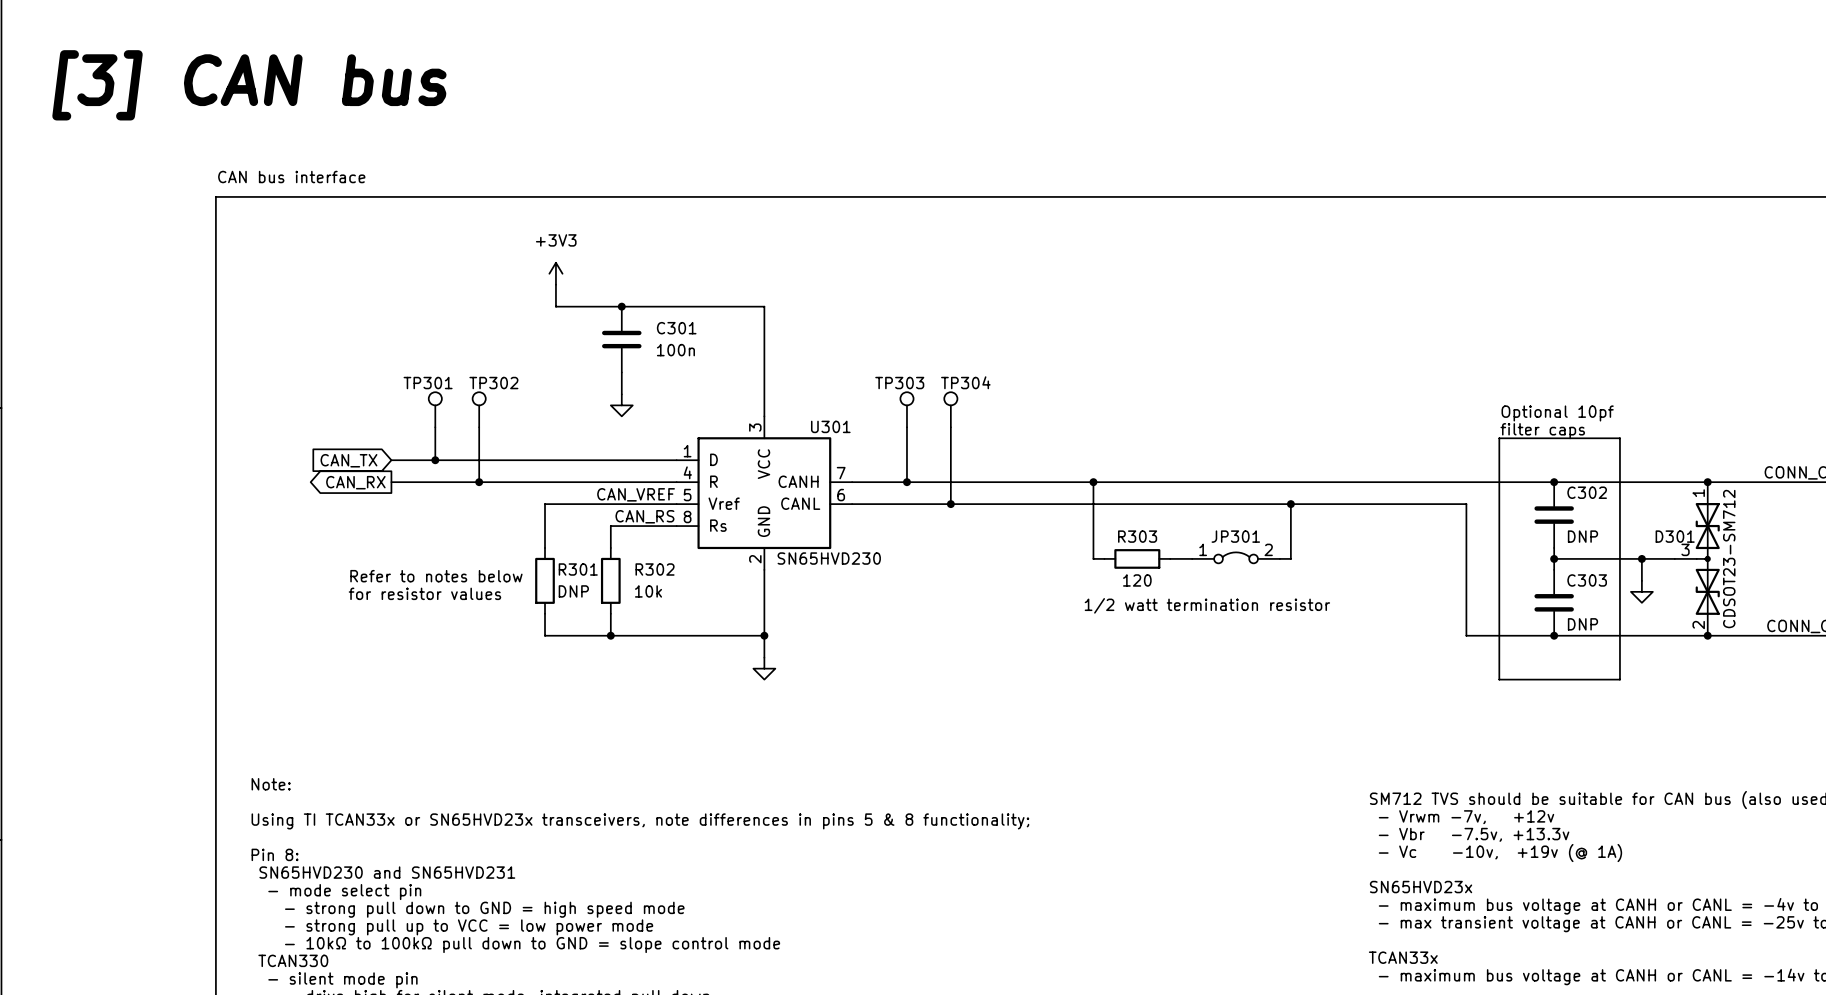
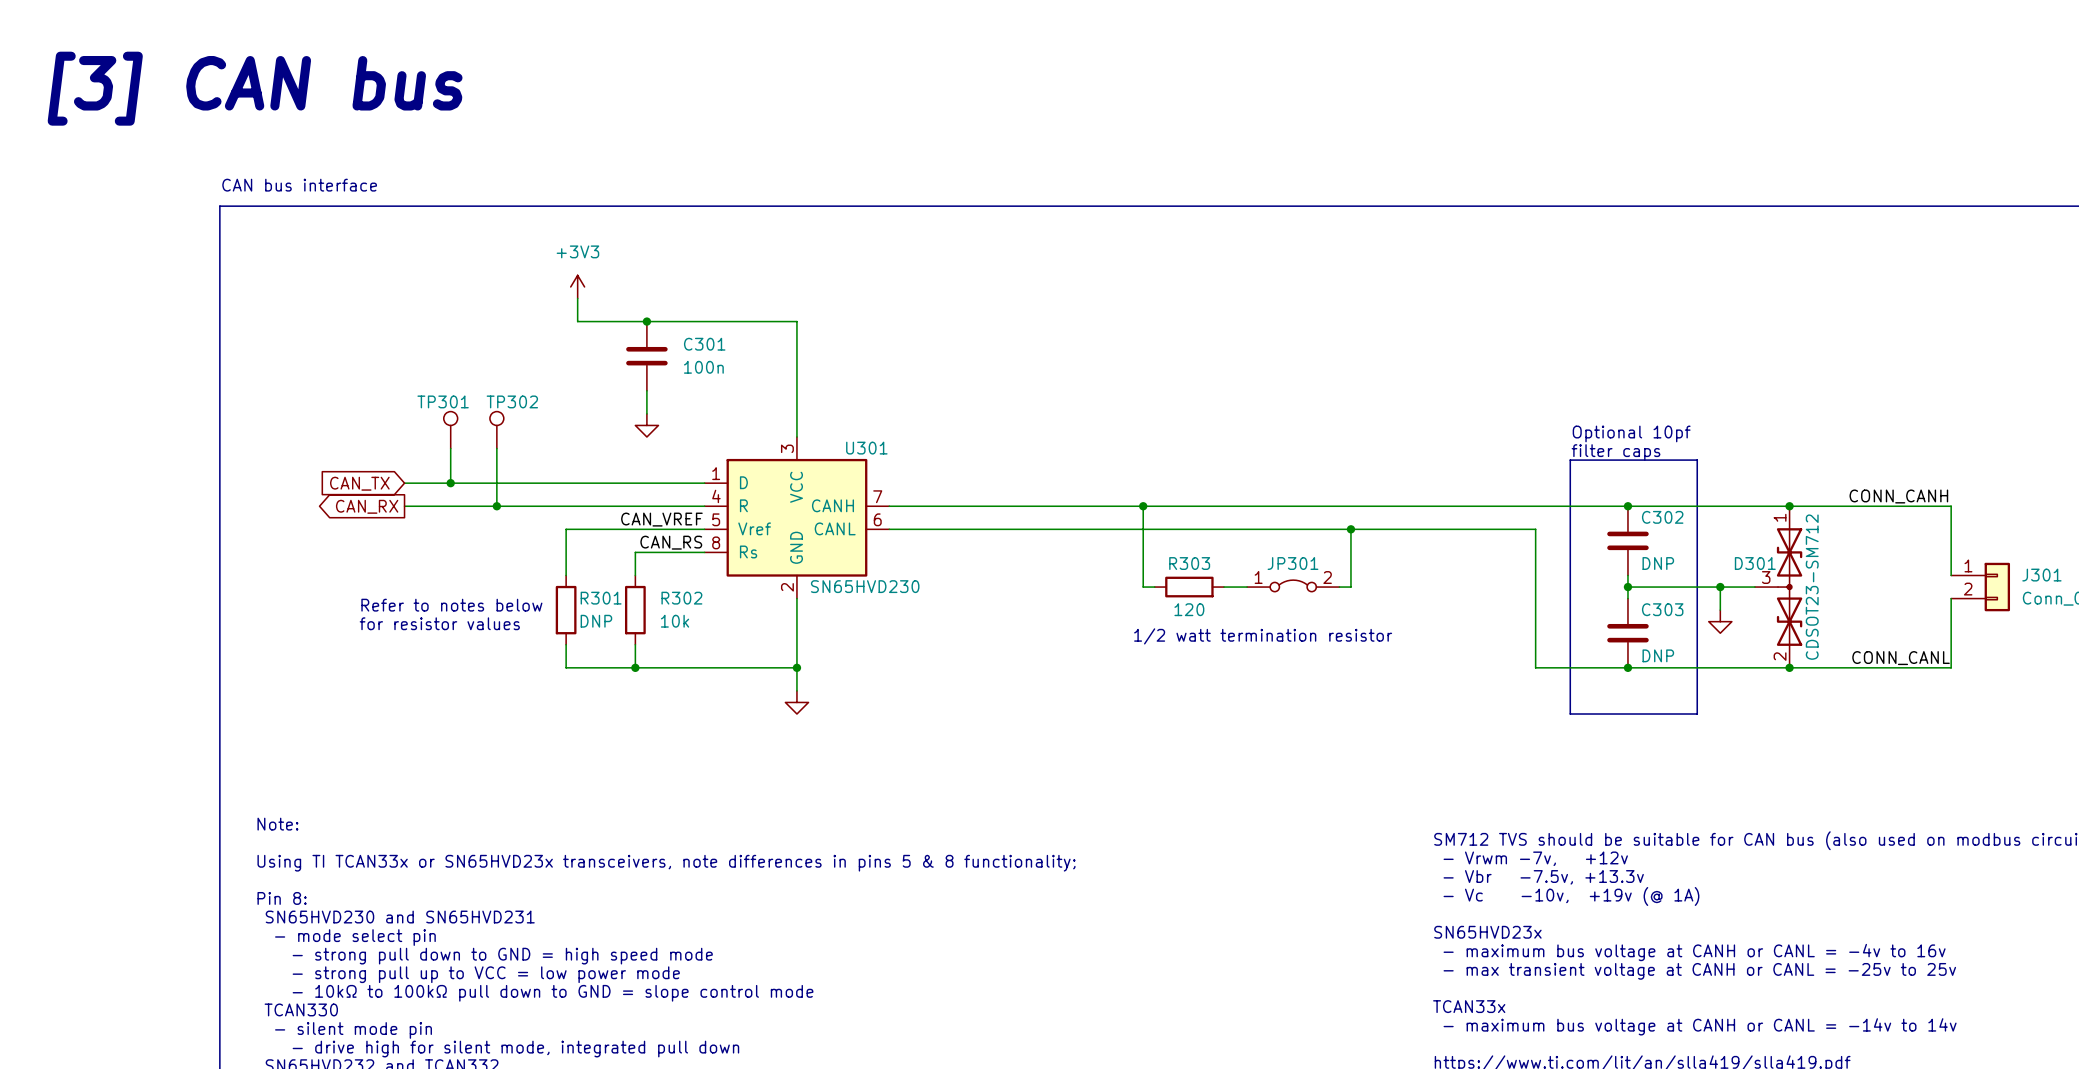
TP303: (906, 409) -> none
TP304: (950, 409) -> none
wire: (906, 427) (906, 482) -> none
wire: (950, 427) (950, 504) -> none
junction: (906, 482) -> none
junction: (950, 504) -> none

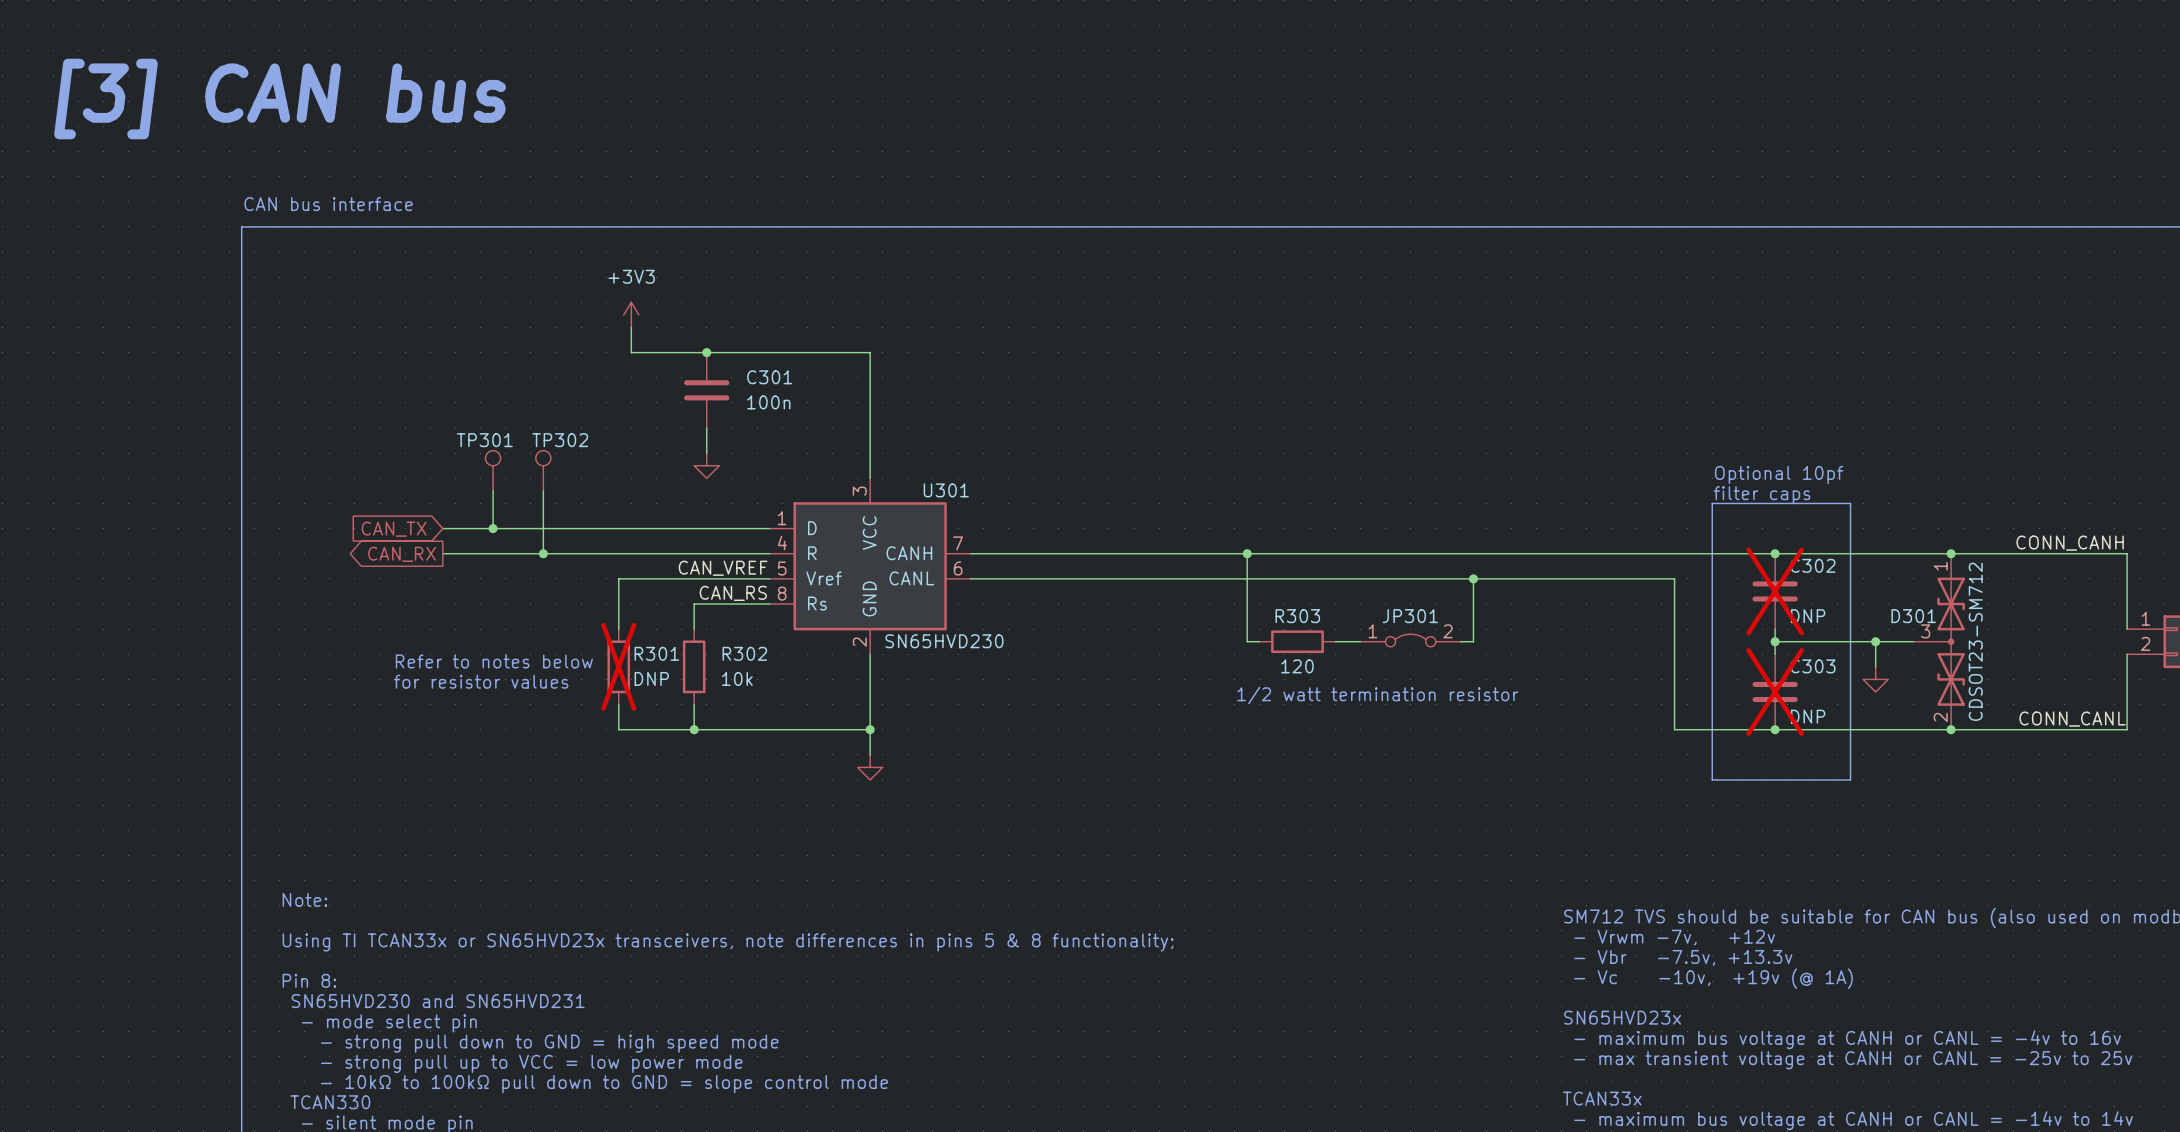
C302 do-not-place cross: none -> (1775, 591)
R301 do-not-place cross: none -> (618, 666)
C303 do-not-place cross: none -> (1775, 691)

